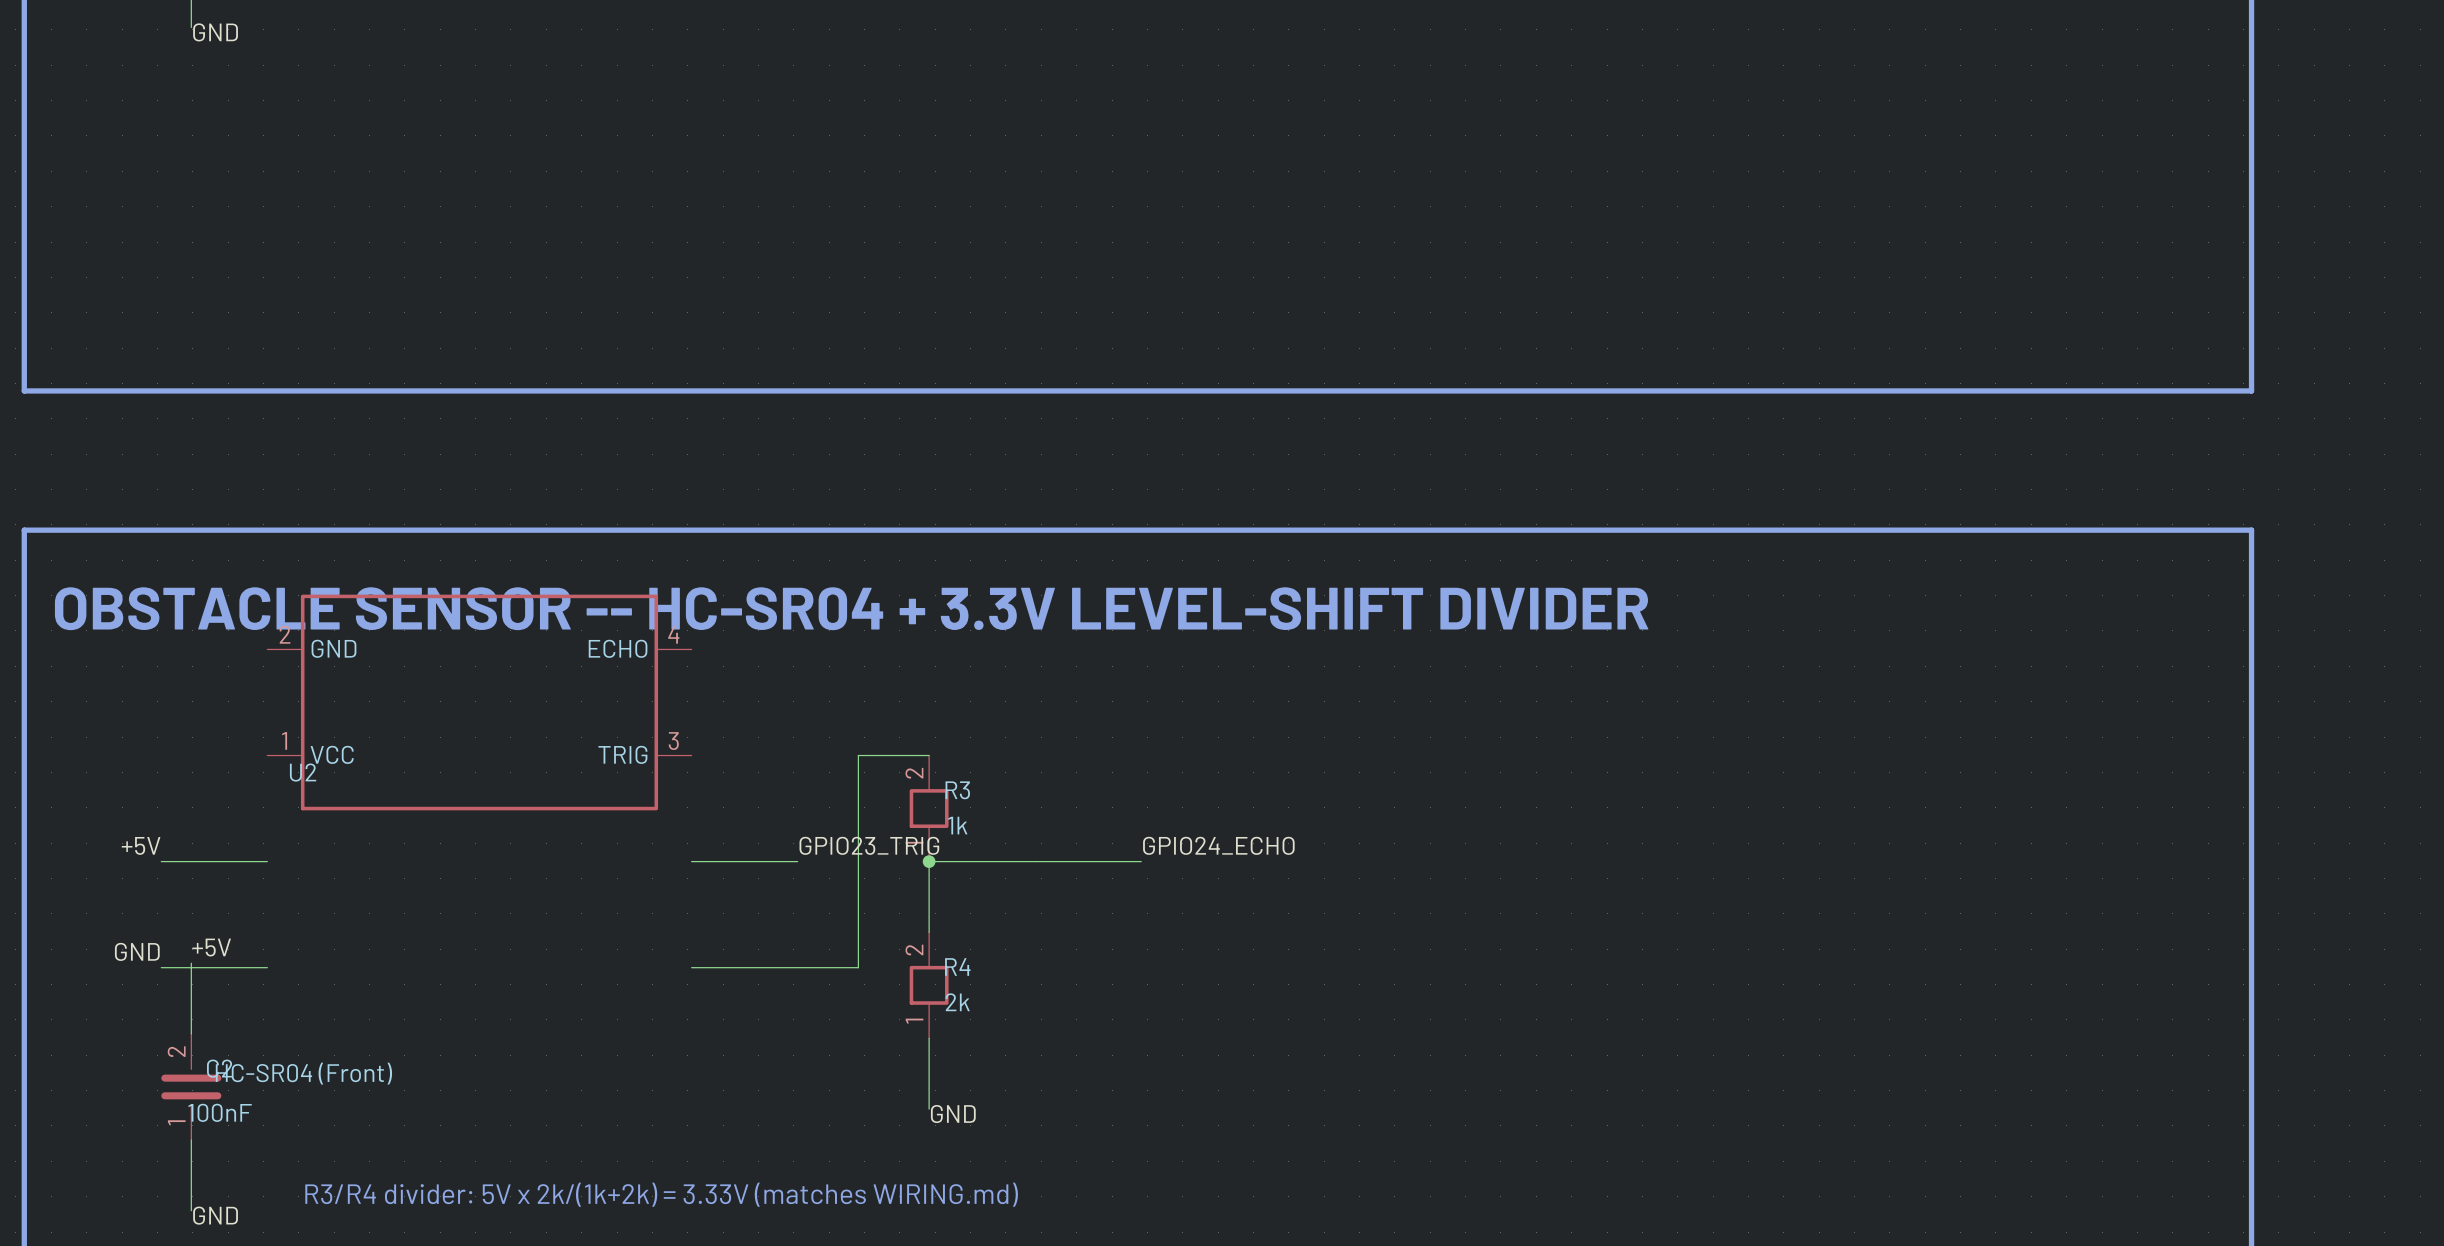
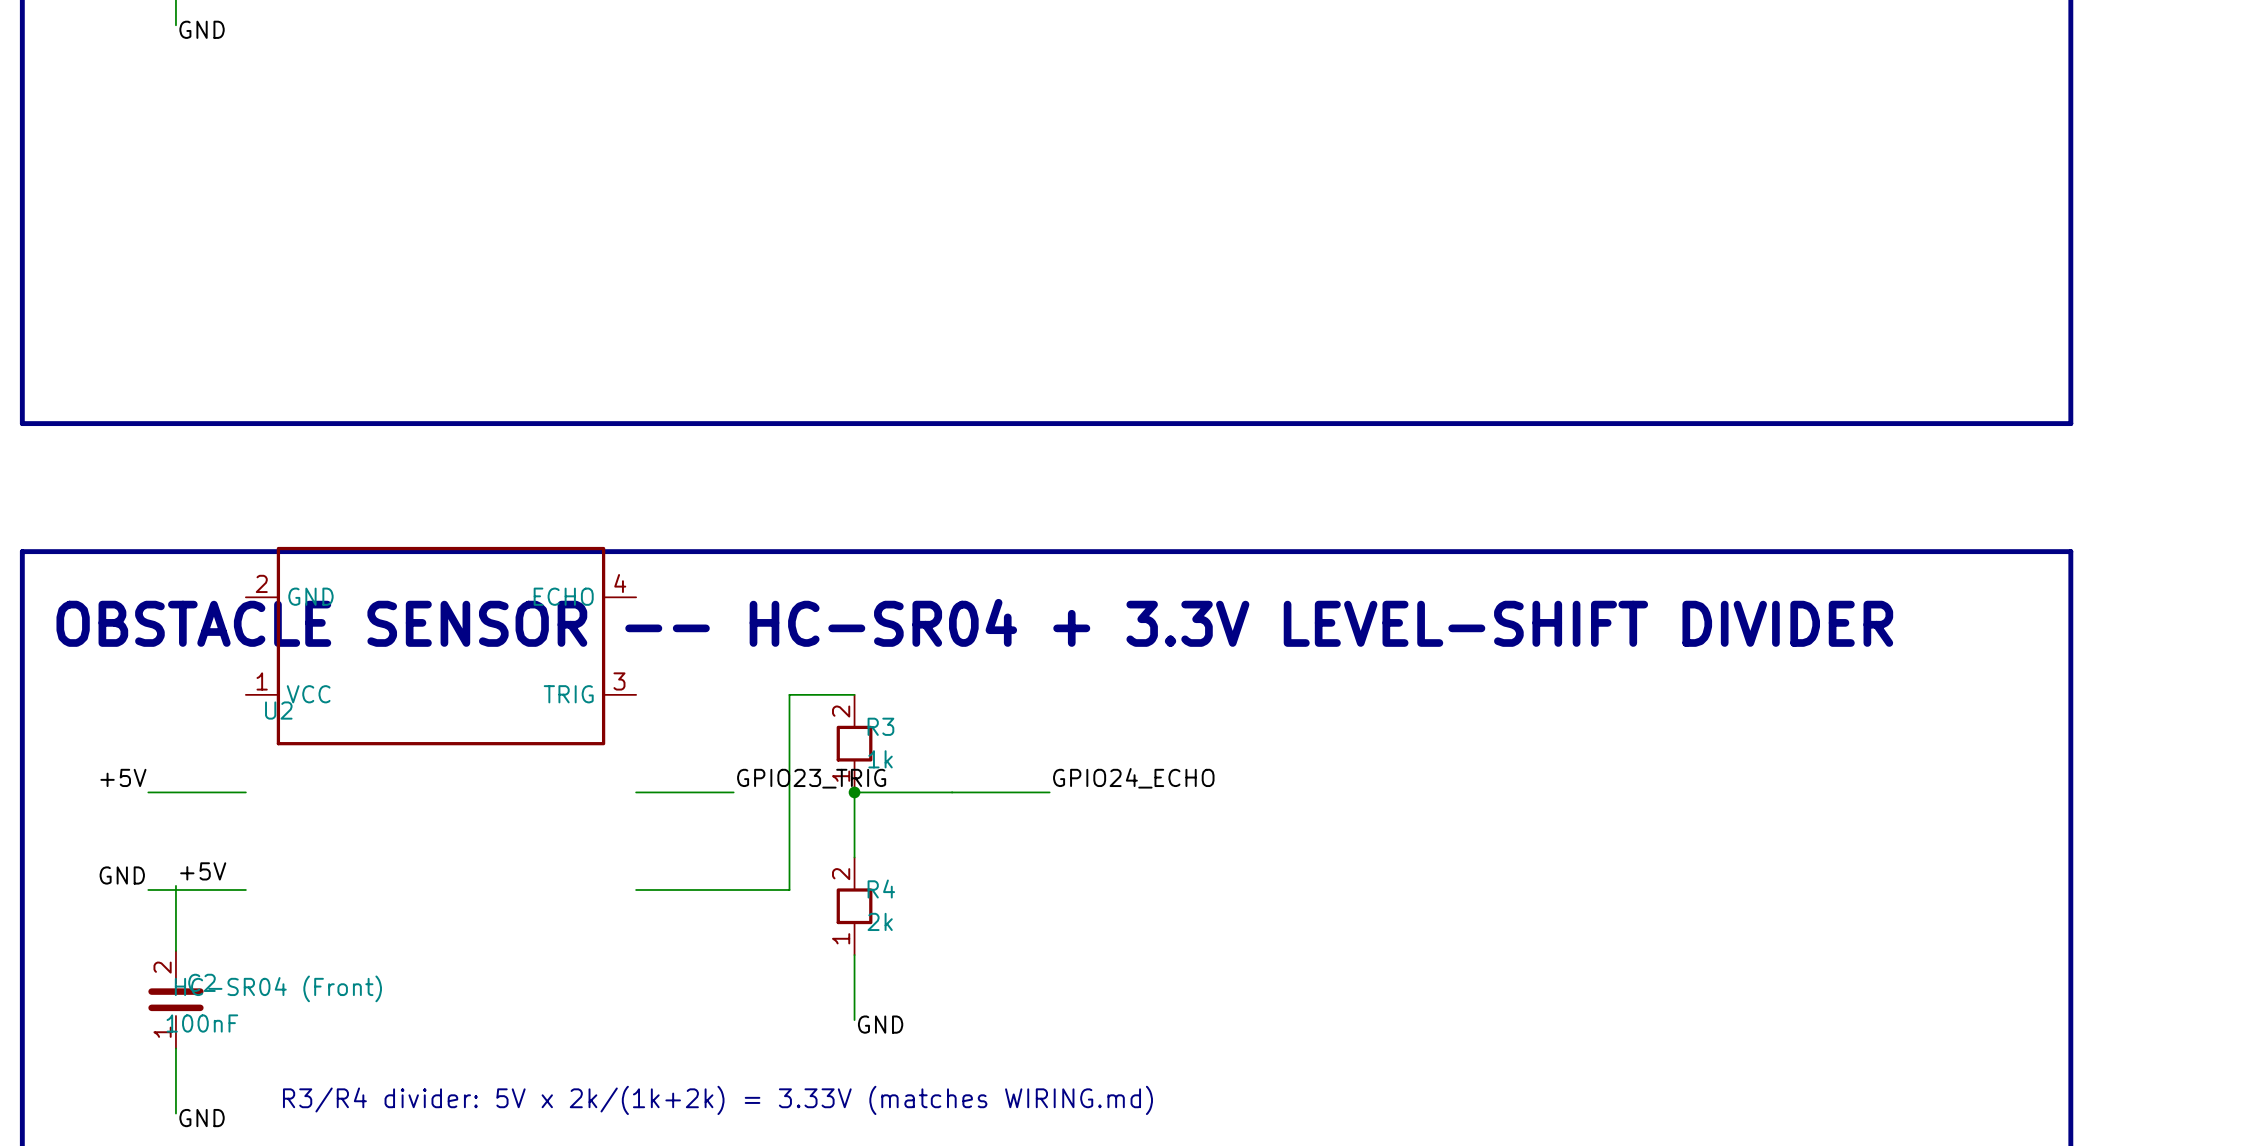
line: (24, 390) (2251, 390) -> (22, 359) (22, 423) (2070, 423) (2070, 359)
line: (24, 599) (24, 530) (2251, 530) (2251, 599) -> (22, 551) (2070, 551)
text position: OBSTACLE SENSOR -- HC-SR04 + 3.3V LEVEL-SHIFT DIVIDER (851, 608) -> OBSTACLE SENSOR -- HC-SR04 + 3.3V LEVEL-SHIFT DIVIDER (974, 622)

